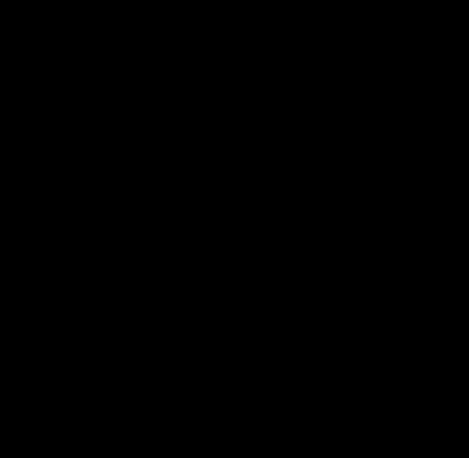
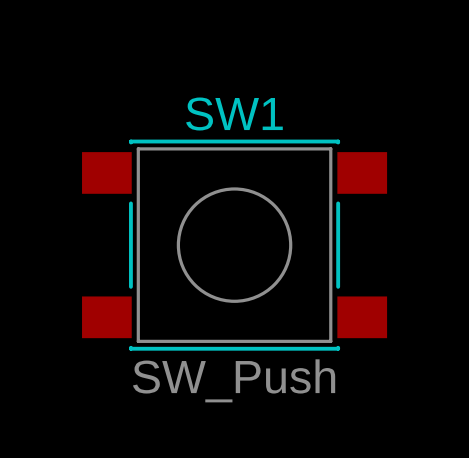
SW1: none -> SW_Push (234, 245)

